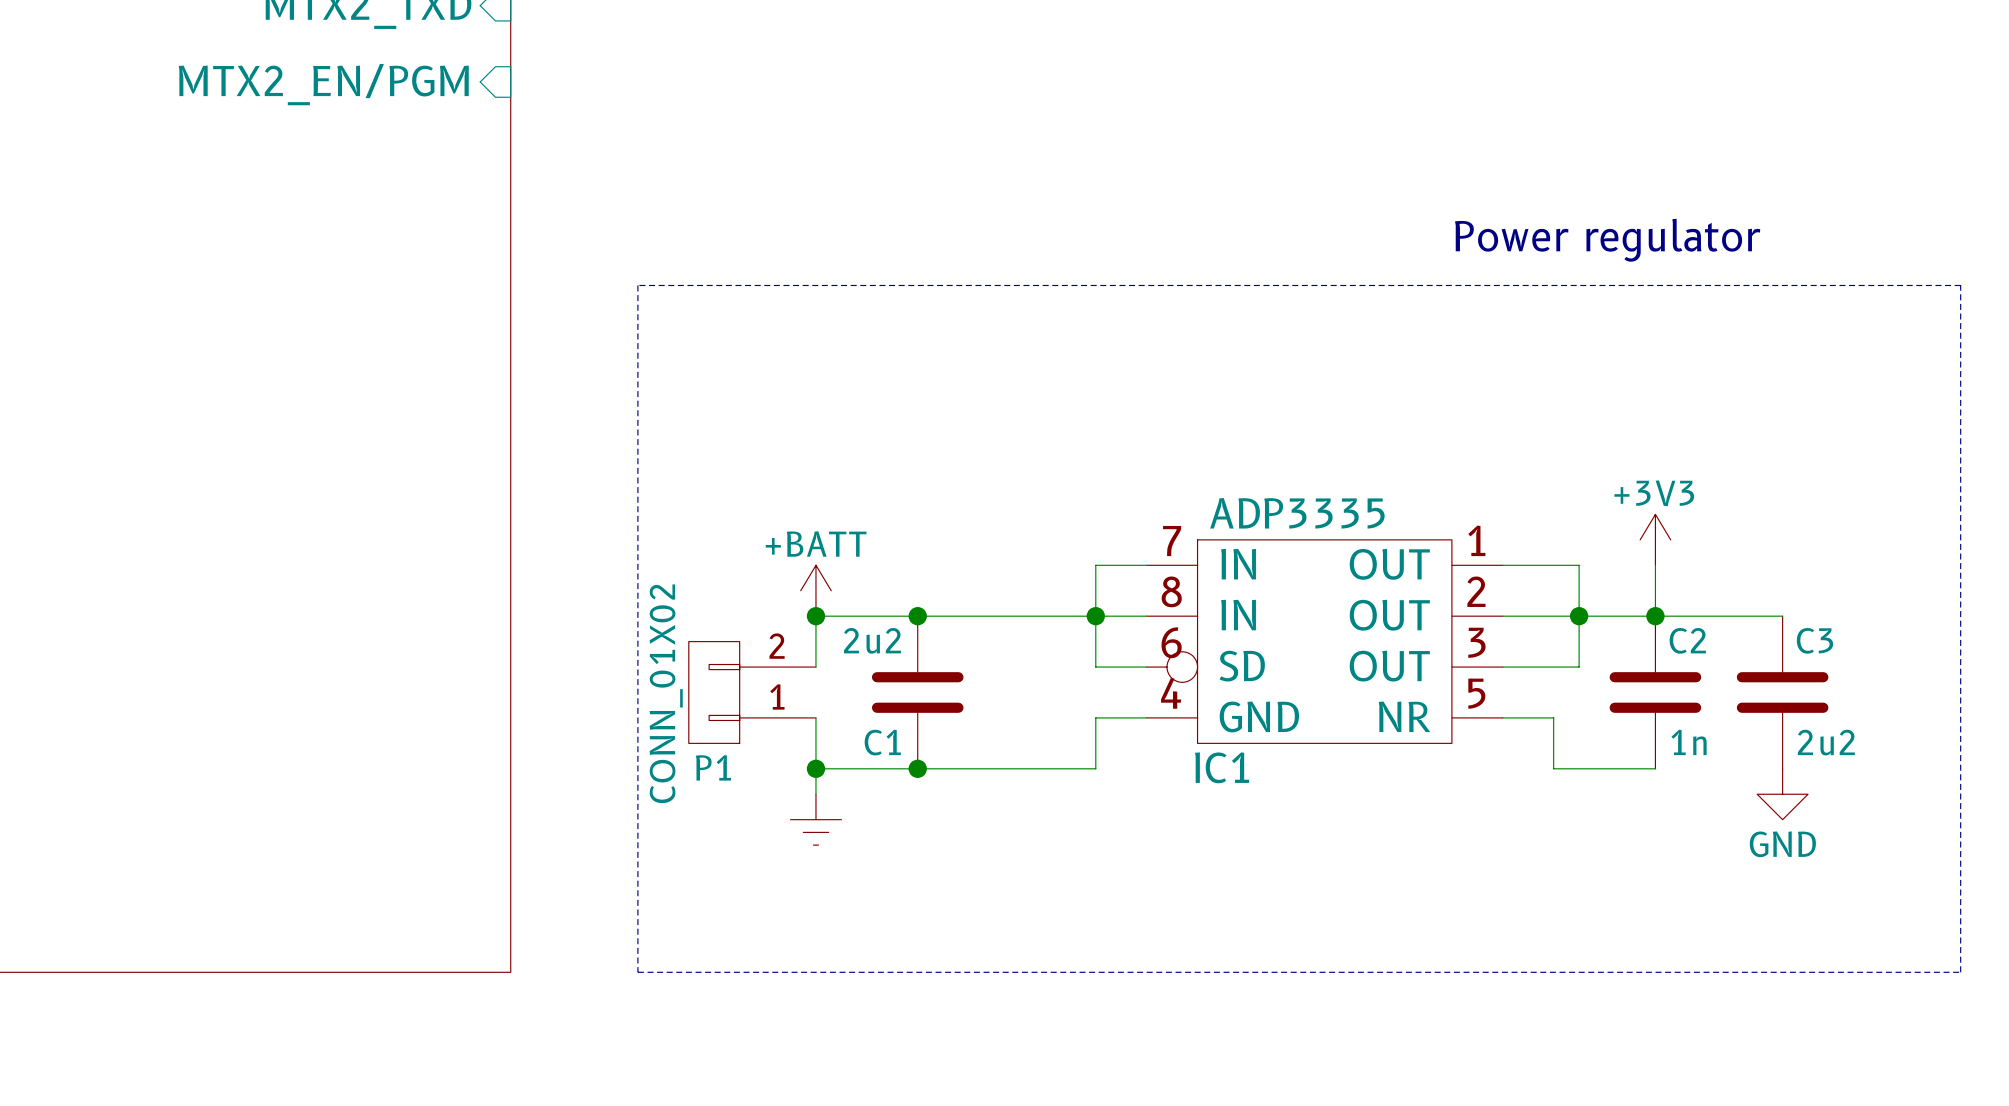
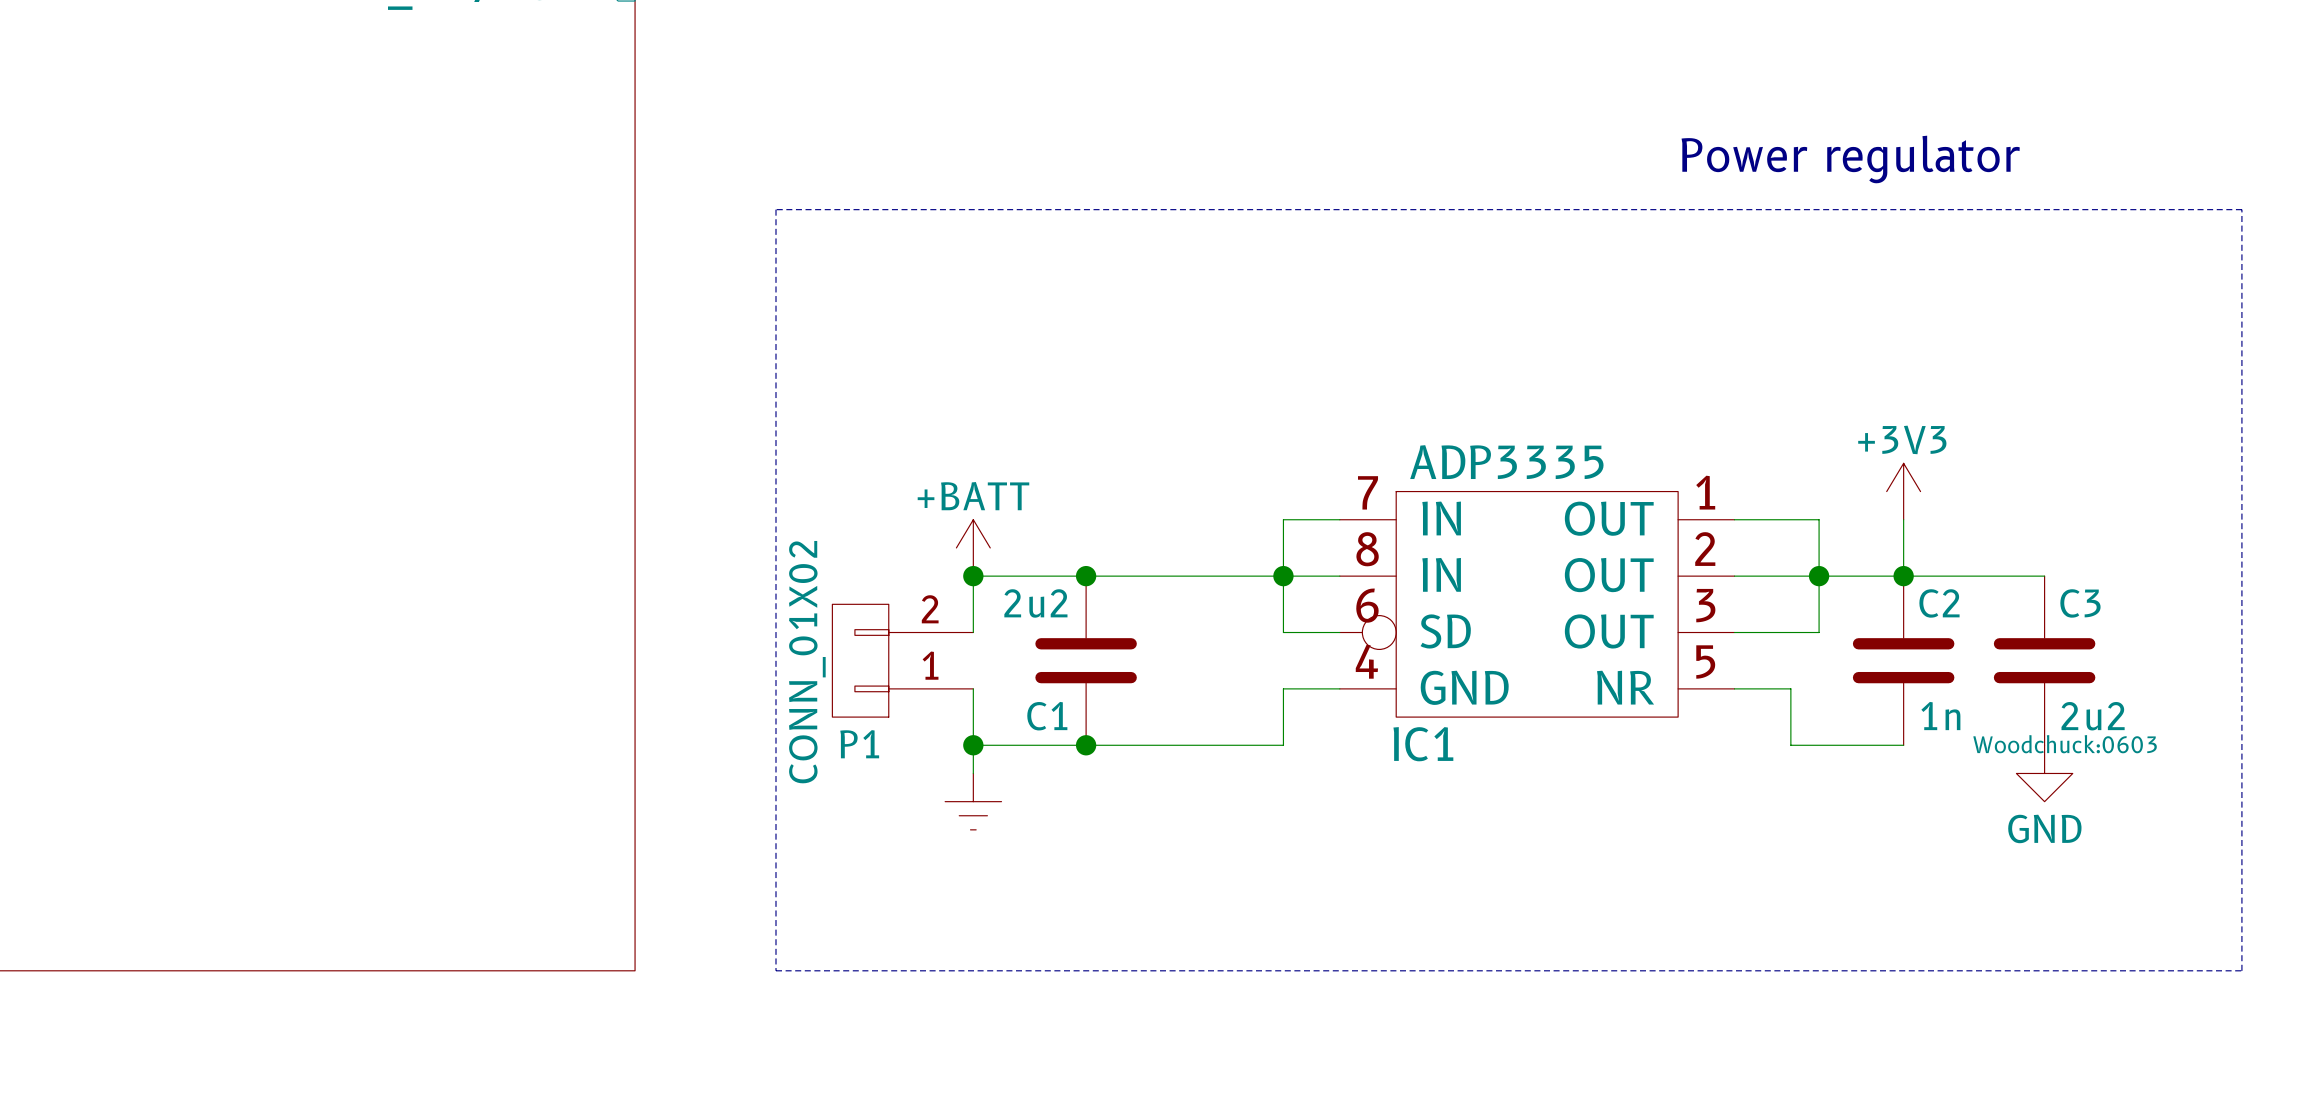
C3 text: none -> Woodchuck:0603 (2065, 744)

